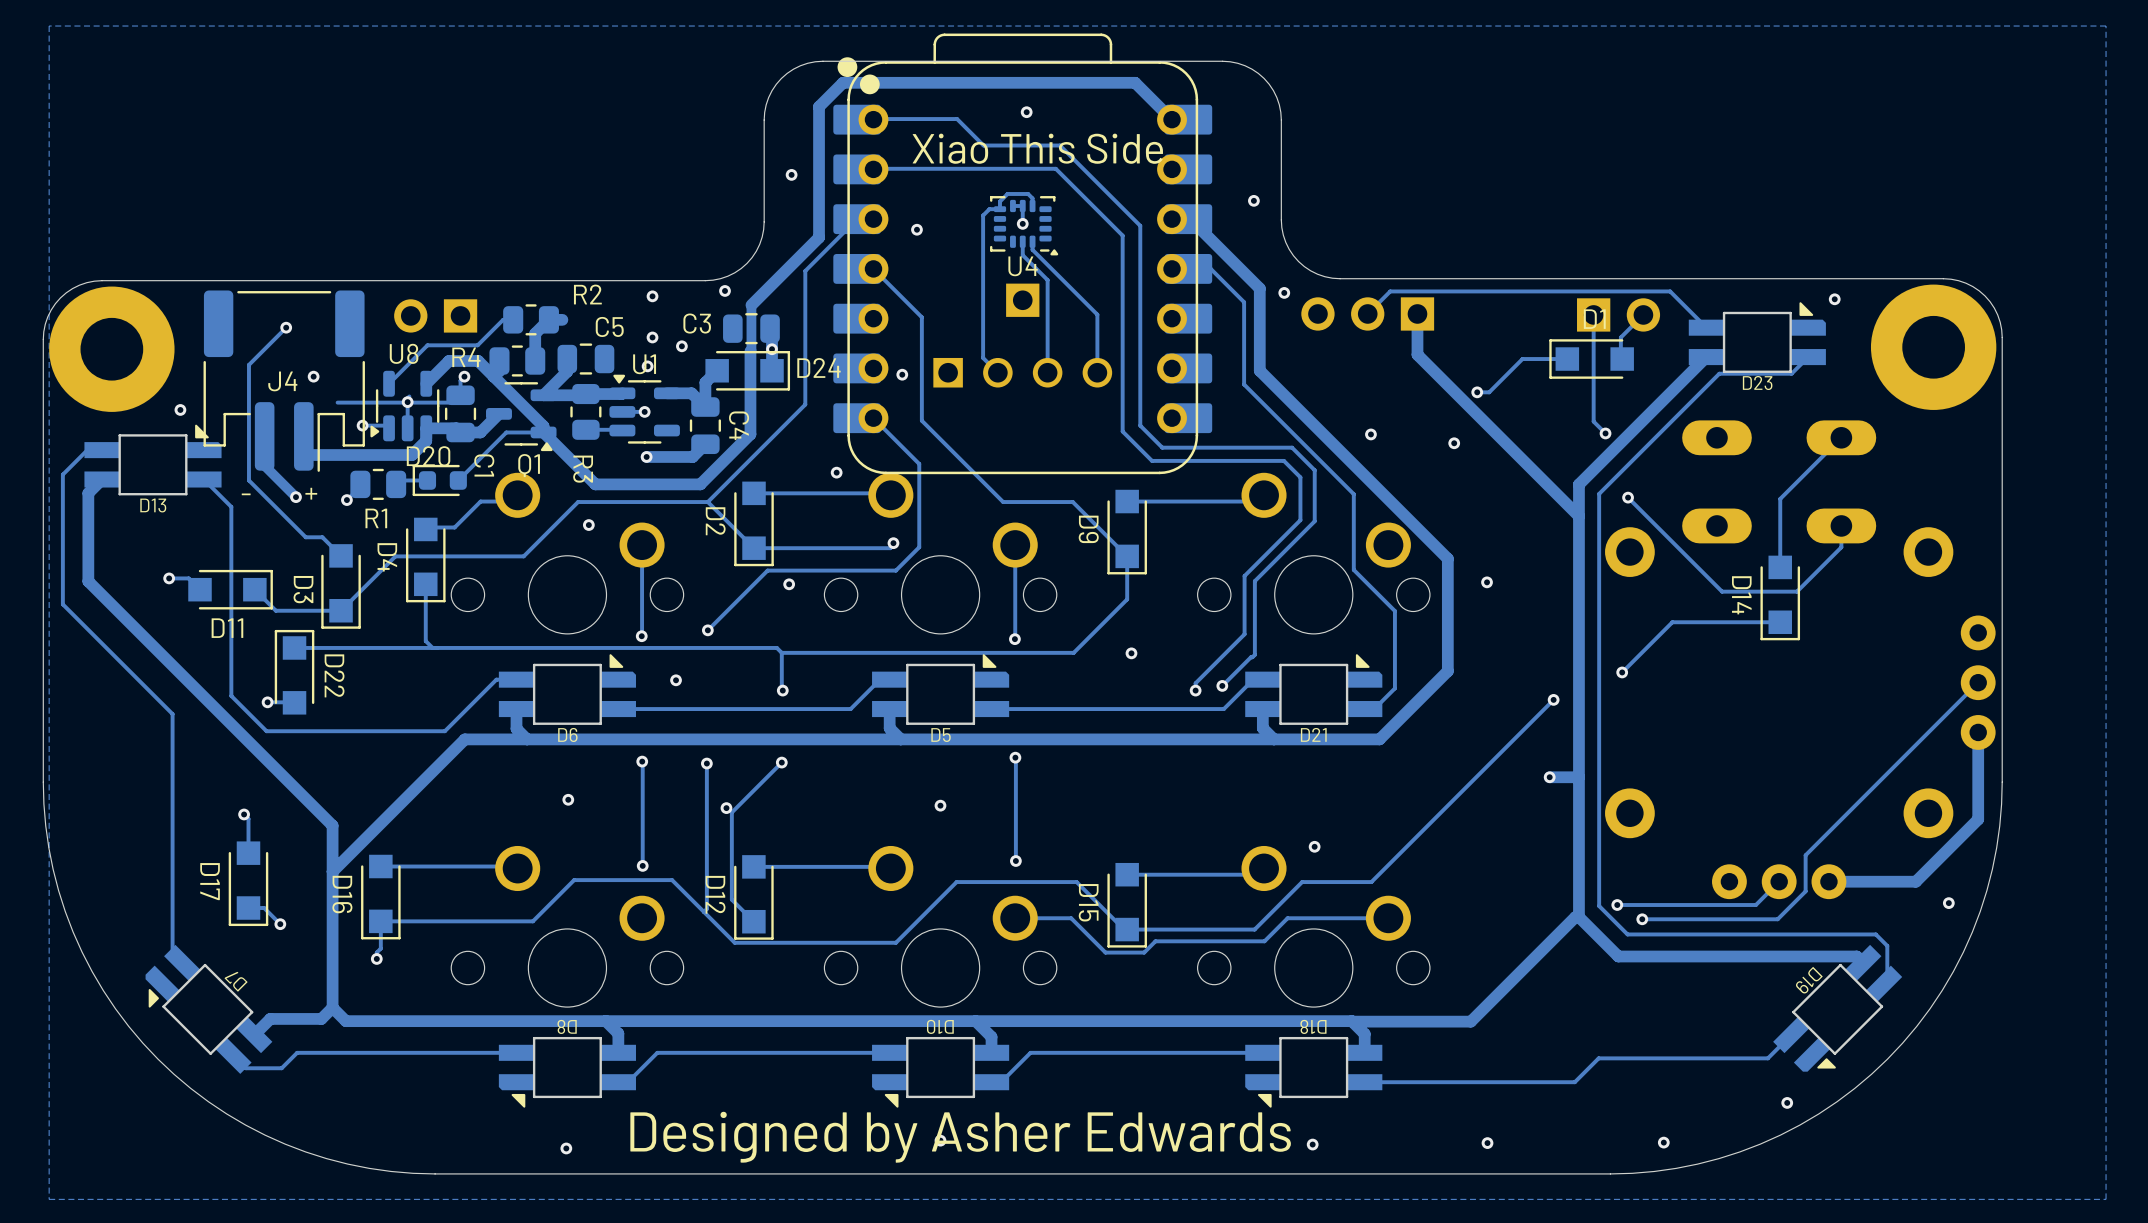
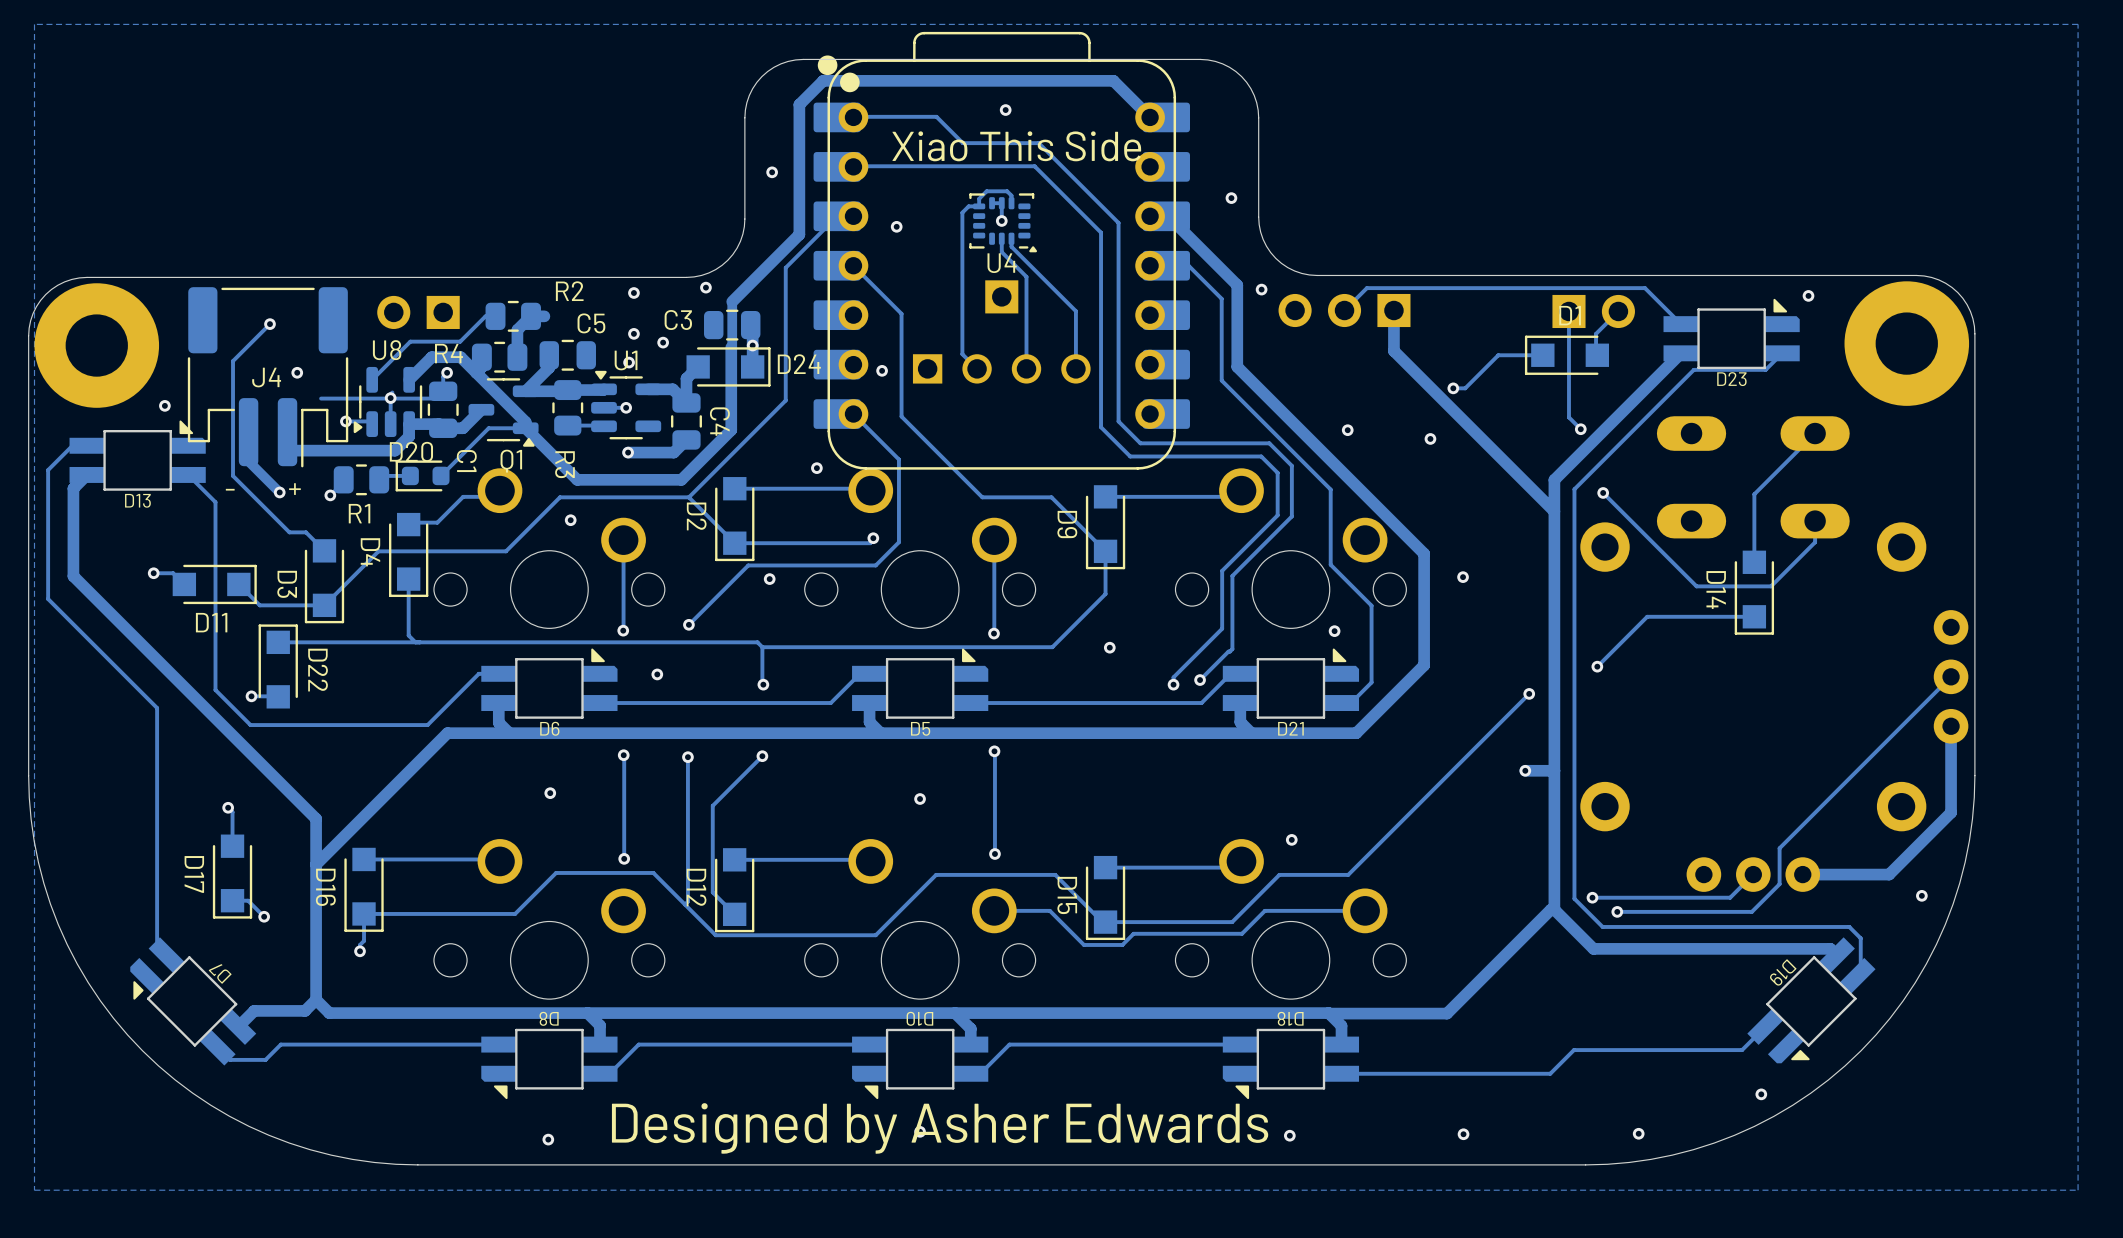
via: none -> (1334, 631)
via: (726, 808) -> none

